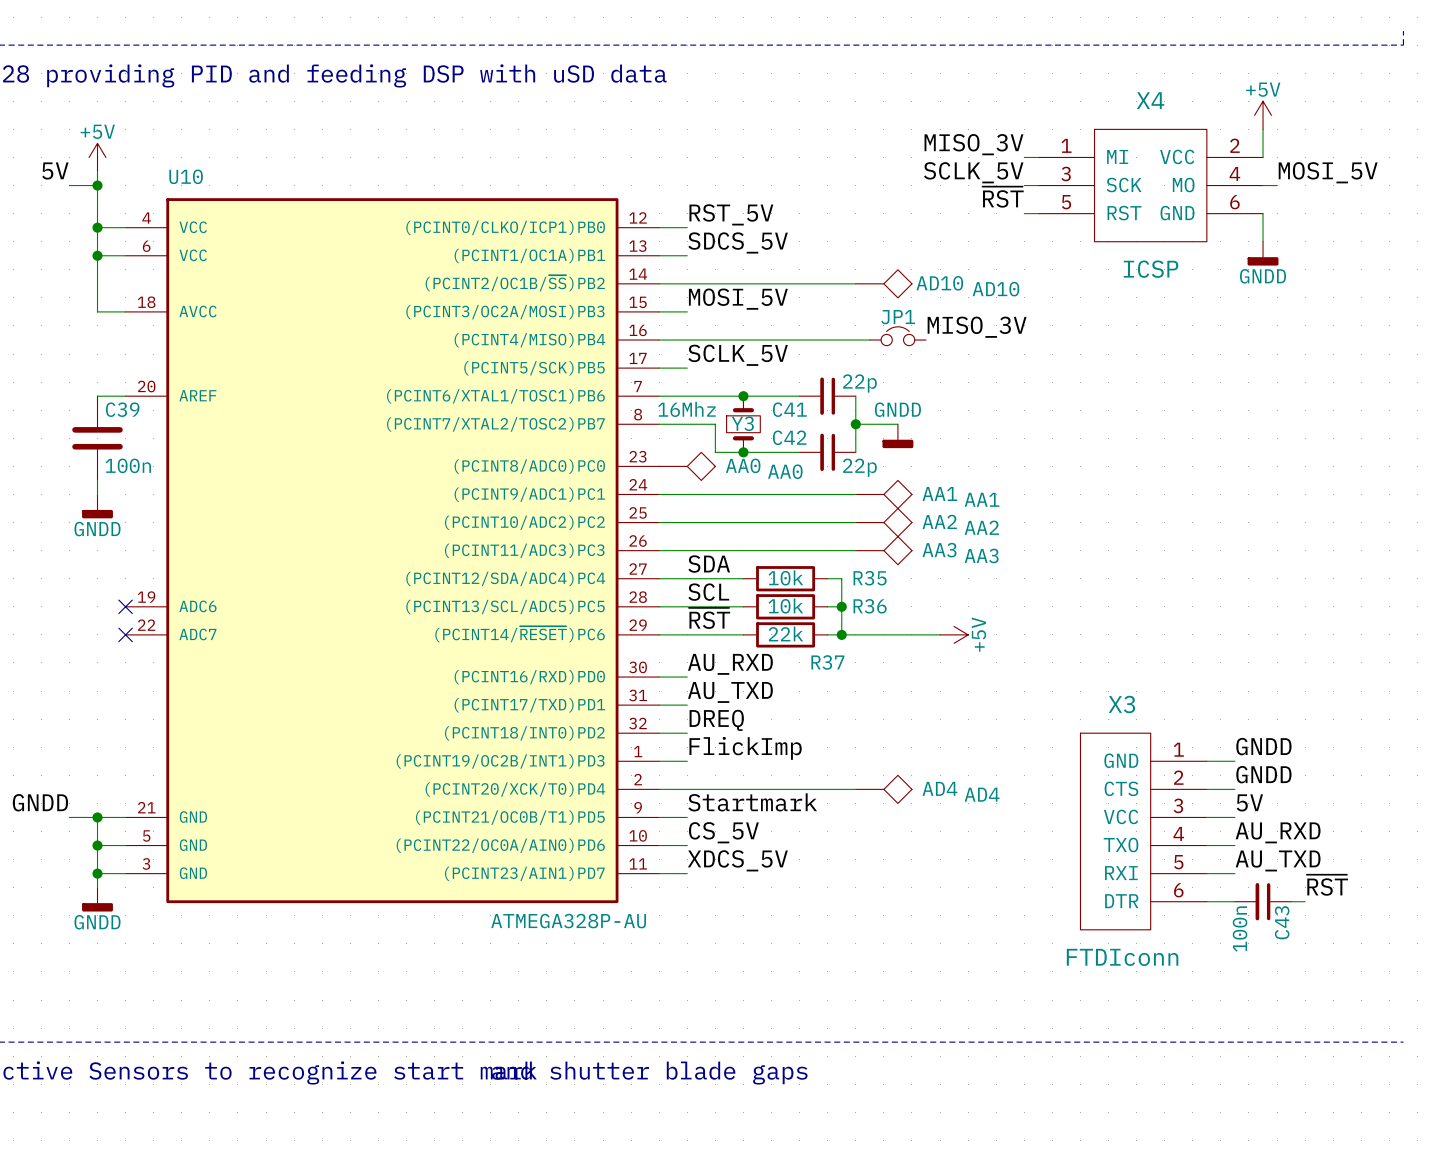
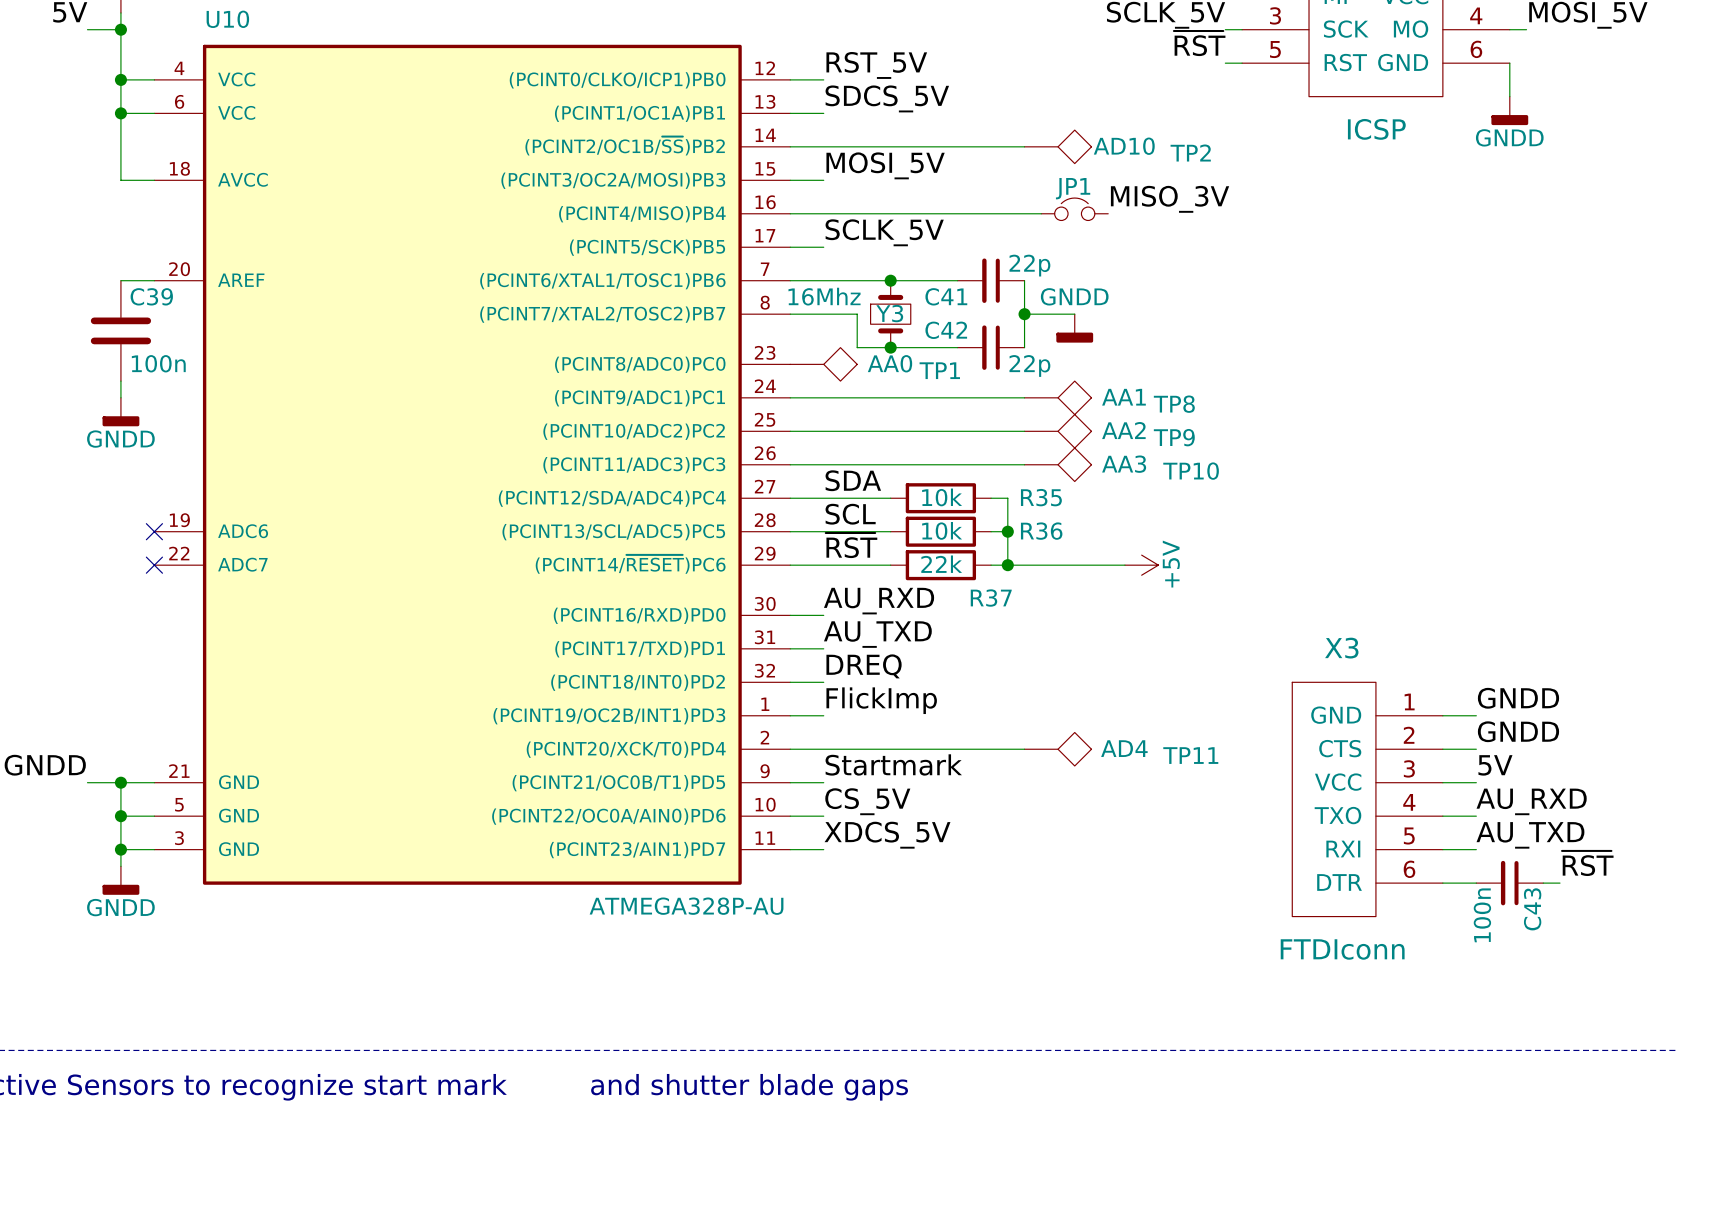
AD10 name: AD10 (995, 289) -> TP2 (1190, 153)
AA0 name: AA0 (785, 471) -> TP1 (939, 370)
AA1 name: AA1 (982, 499) -> TP8 (1174, 404)
AA2 name: AA2 (981, 527) -> TP9 (1174, 437)
AA3 name: AA3 (981, 555) -> TP10 (1191, 471)
AD4 name: AD4 (982, 794) -> TP11 (1190, 755)

